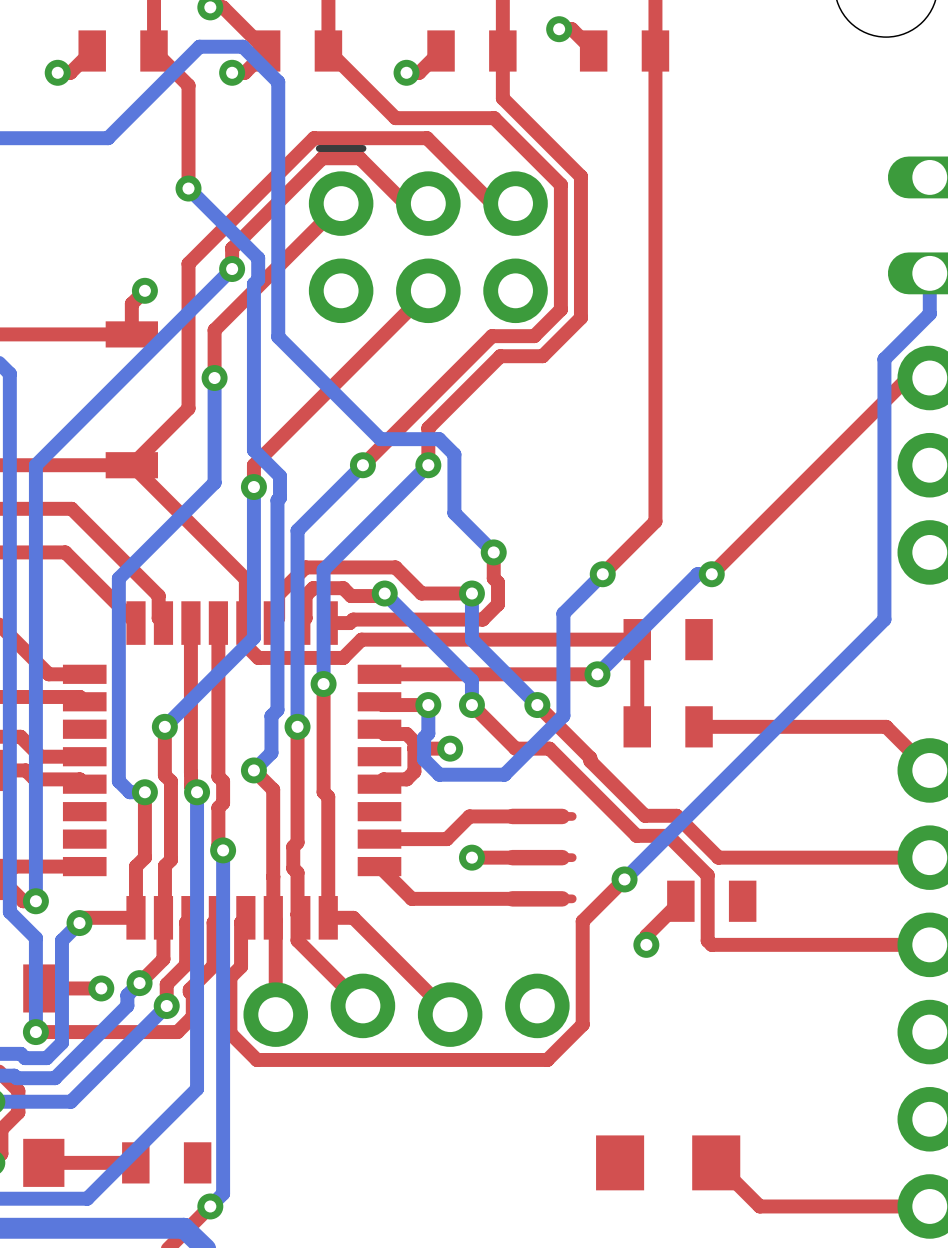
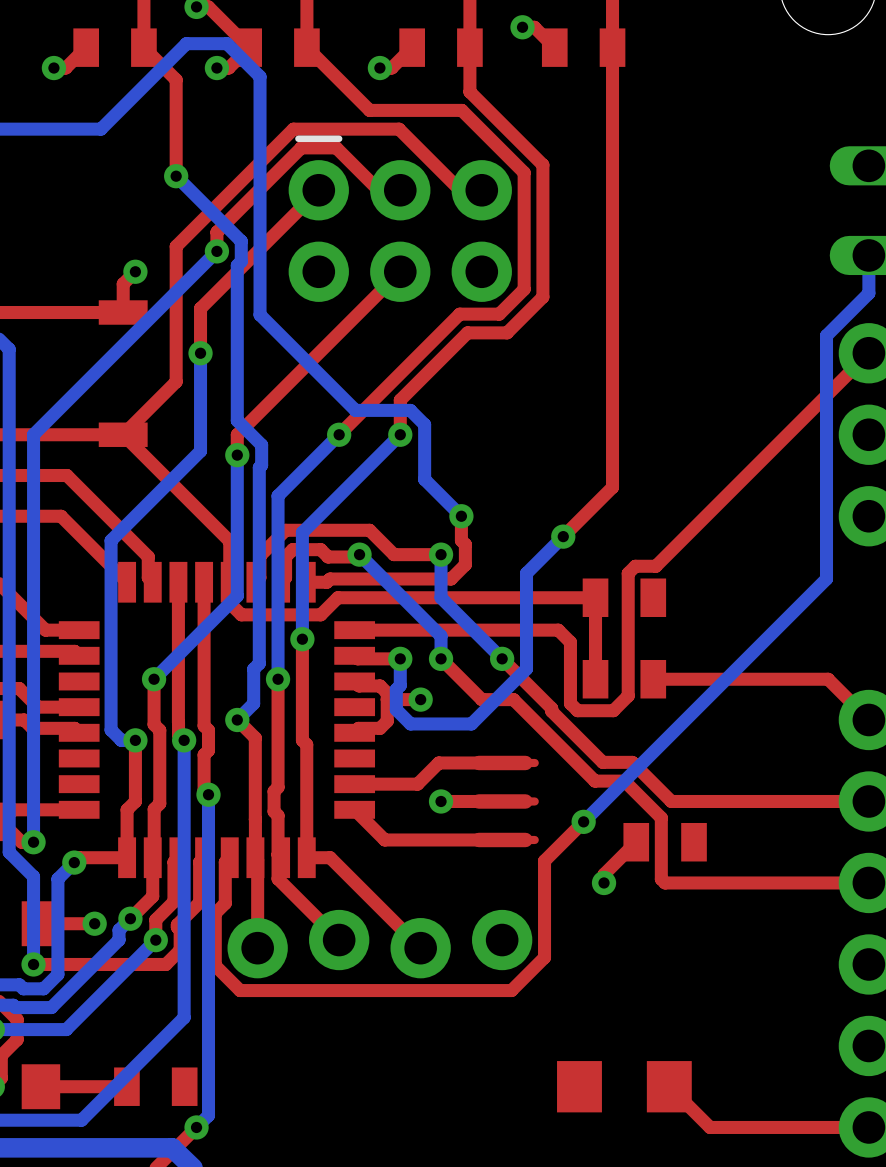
top track: (929, 378) (907, 378) (711, 574) -> (868, 353) (655, 566) (635, 566) (628, 573) (628, 695) (613, 710) (577, 710) (570, 703) (570, 642) (558, 630)
bottom track: (711, 574) (697, 574) (597, 674) -> none
via: (711, 574) -> none
via: (597, 674) -> none

